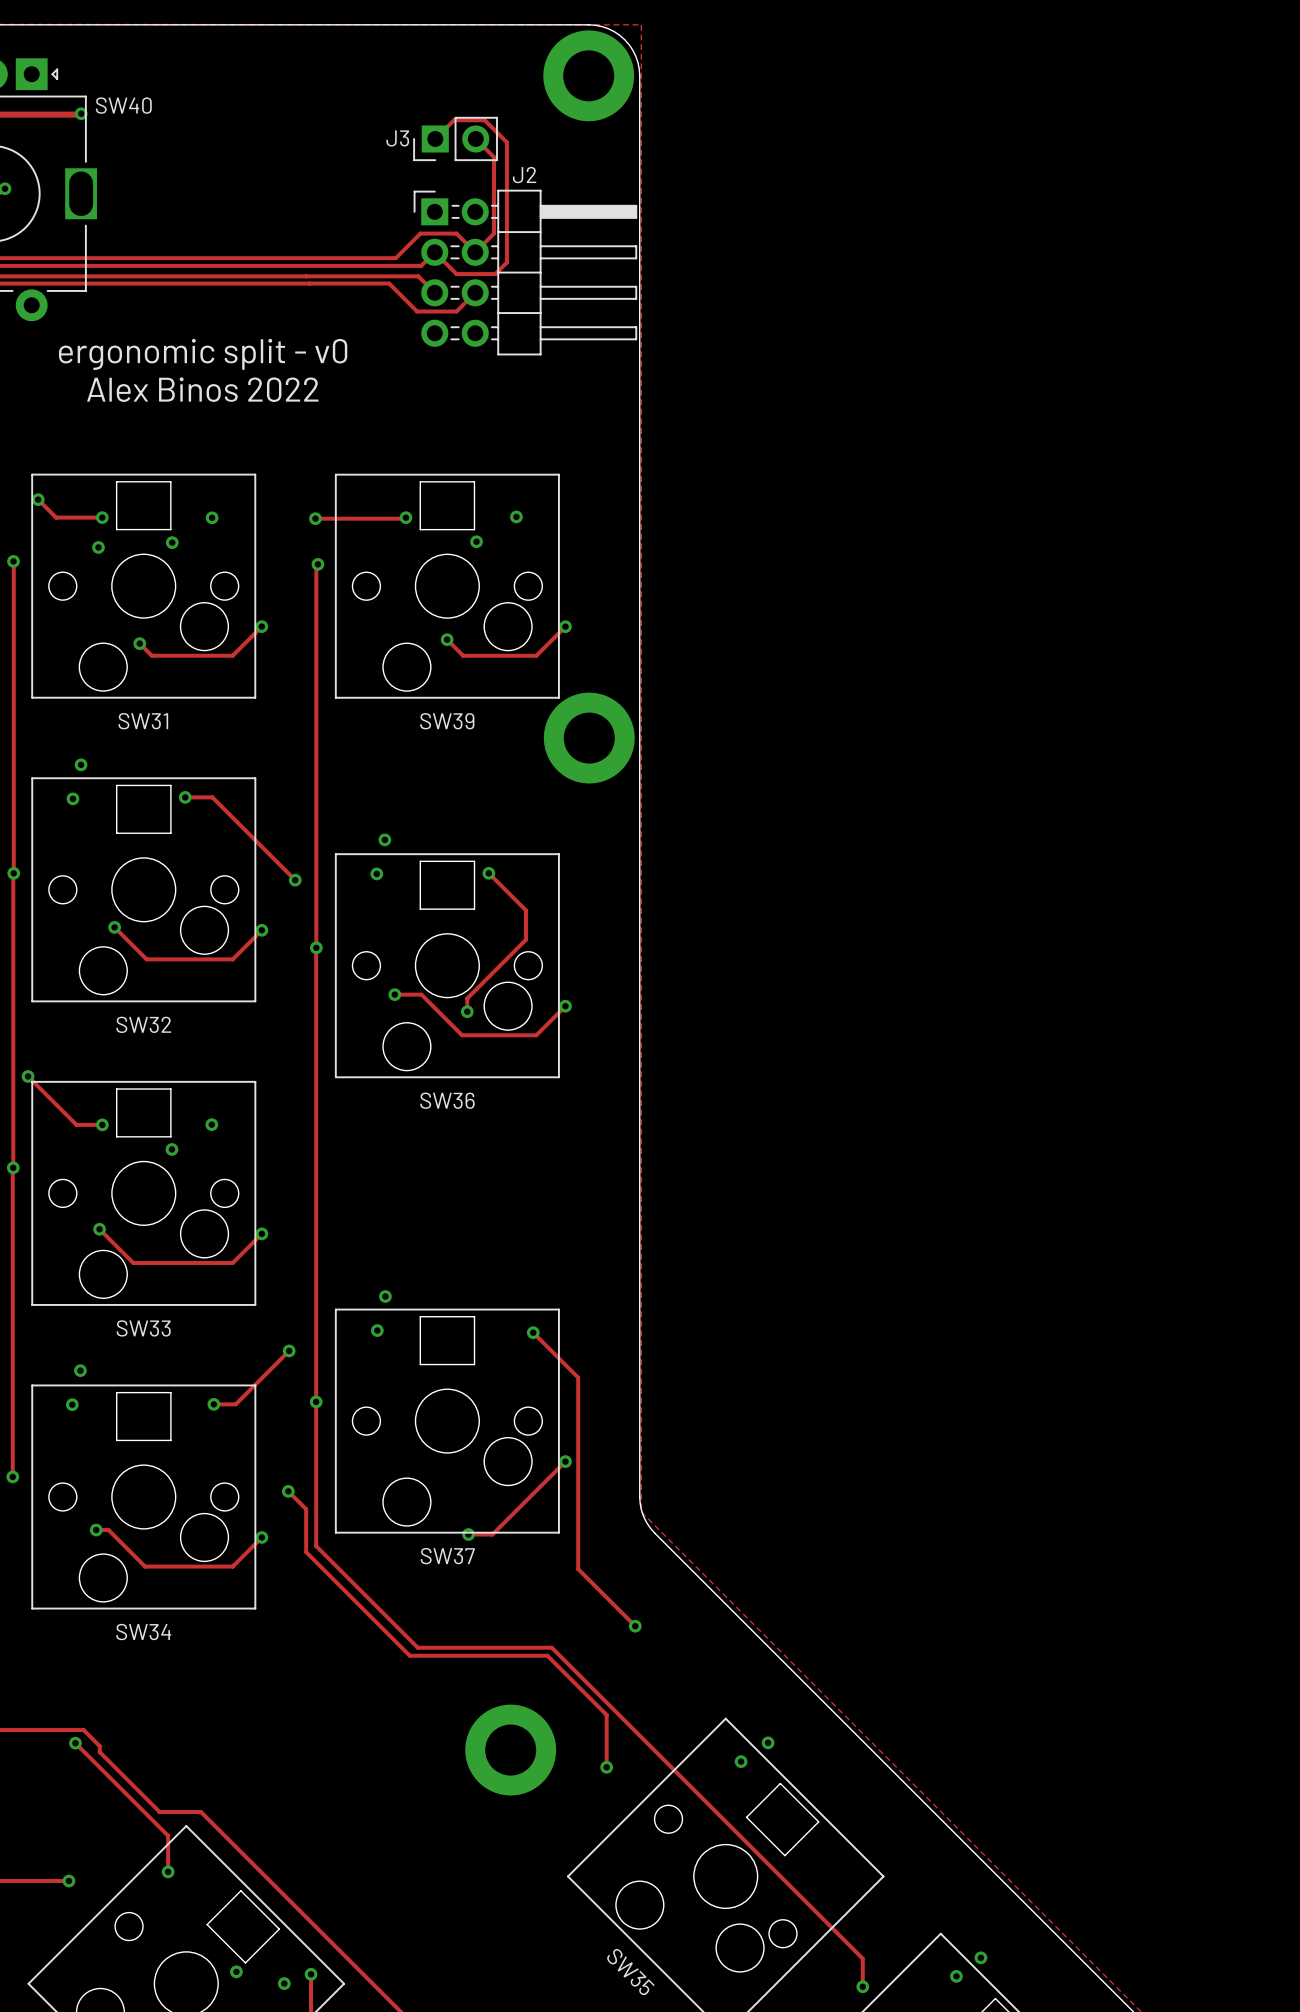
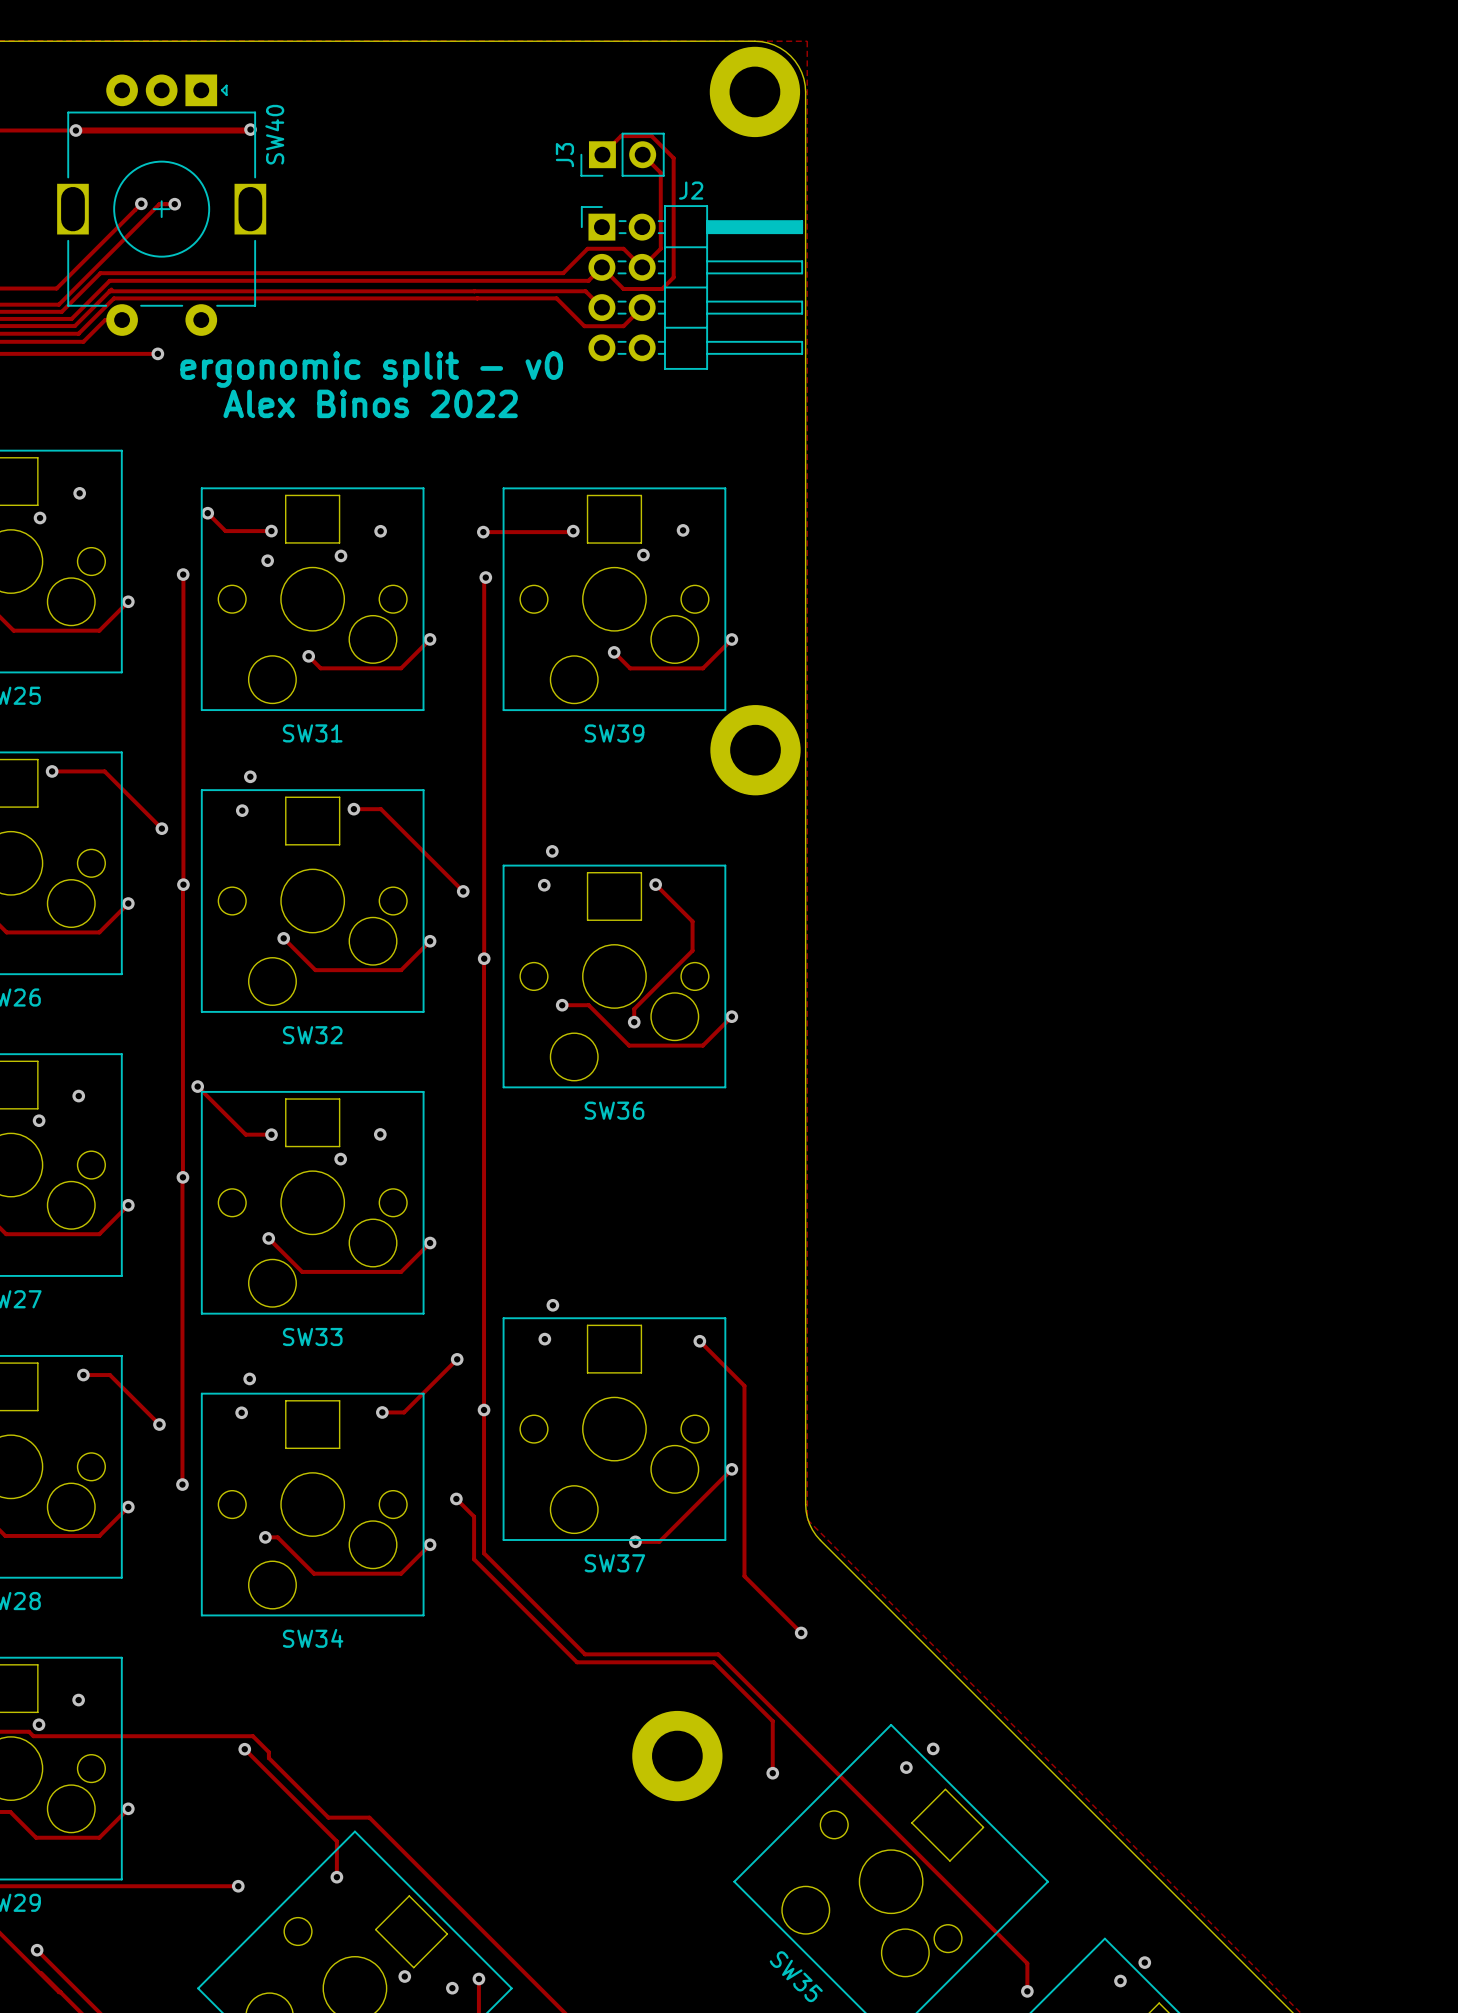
SW40 name rotation: 0° (123, 105) -> 90° counterclockwise (274, 134)
J3 name rotation: 0° (397, 138) -> 90° counterclockwise (564, 155)

